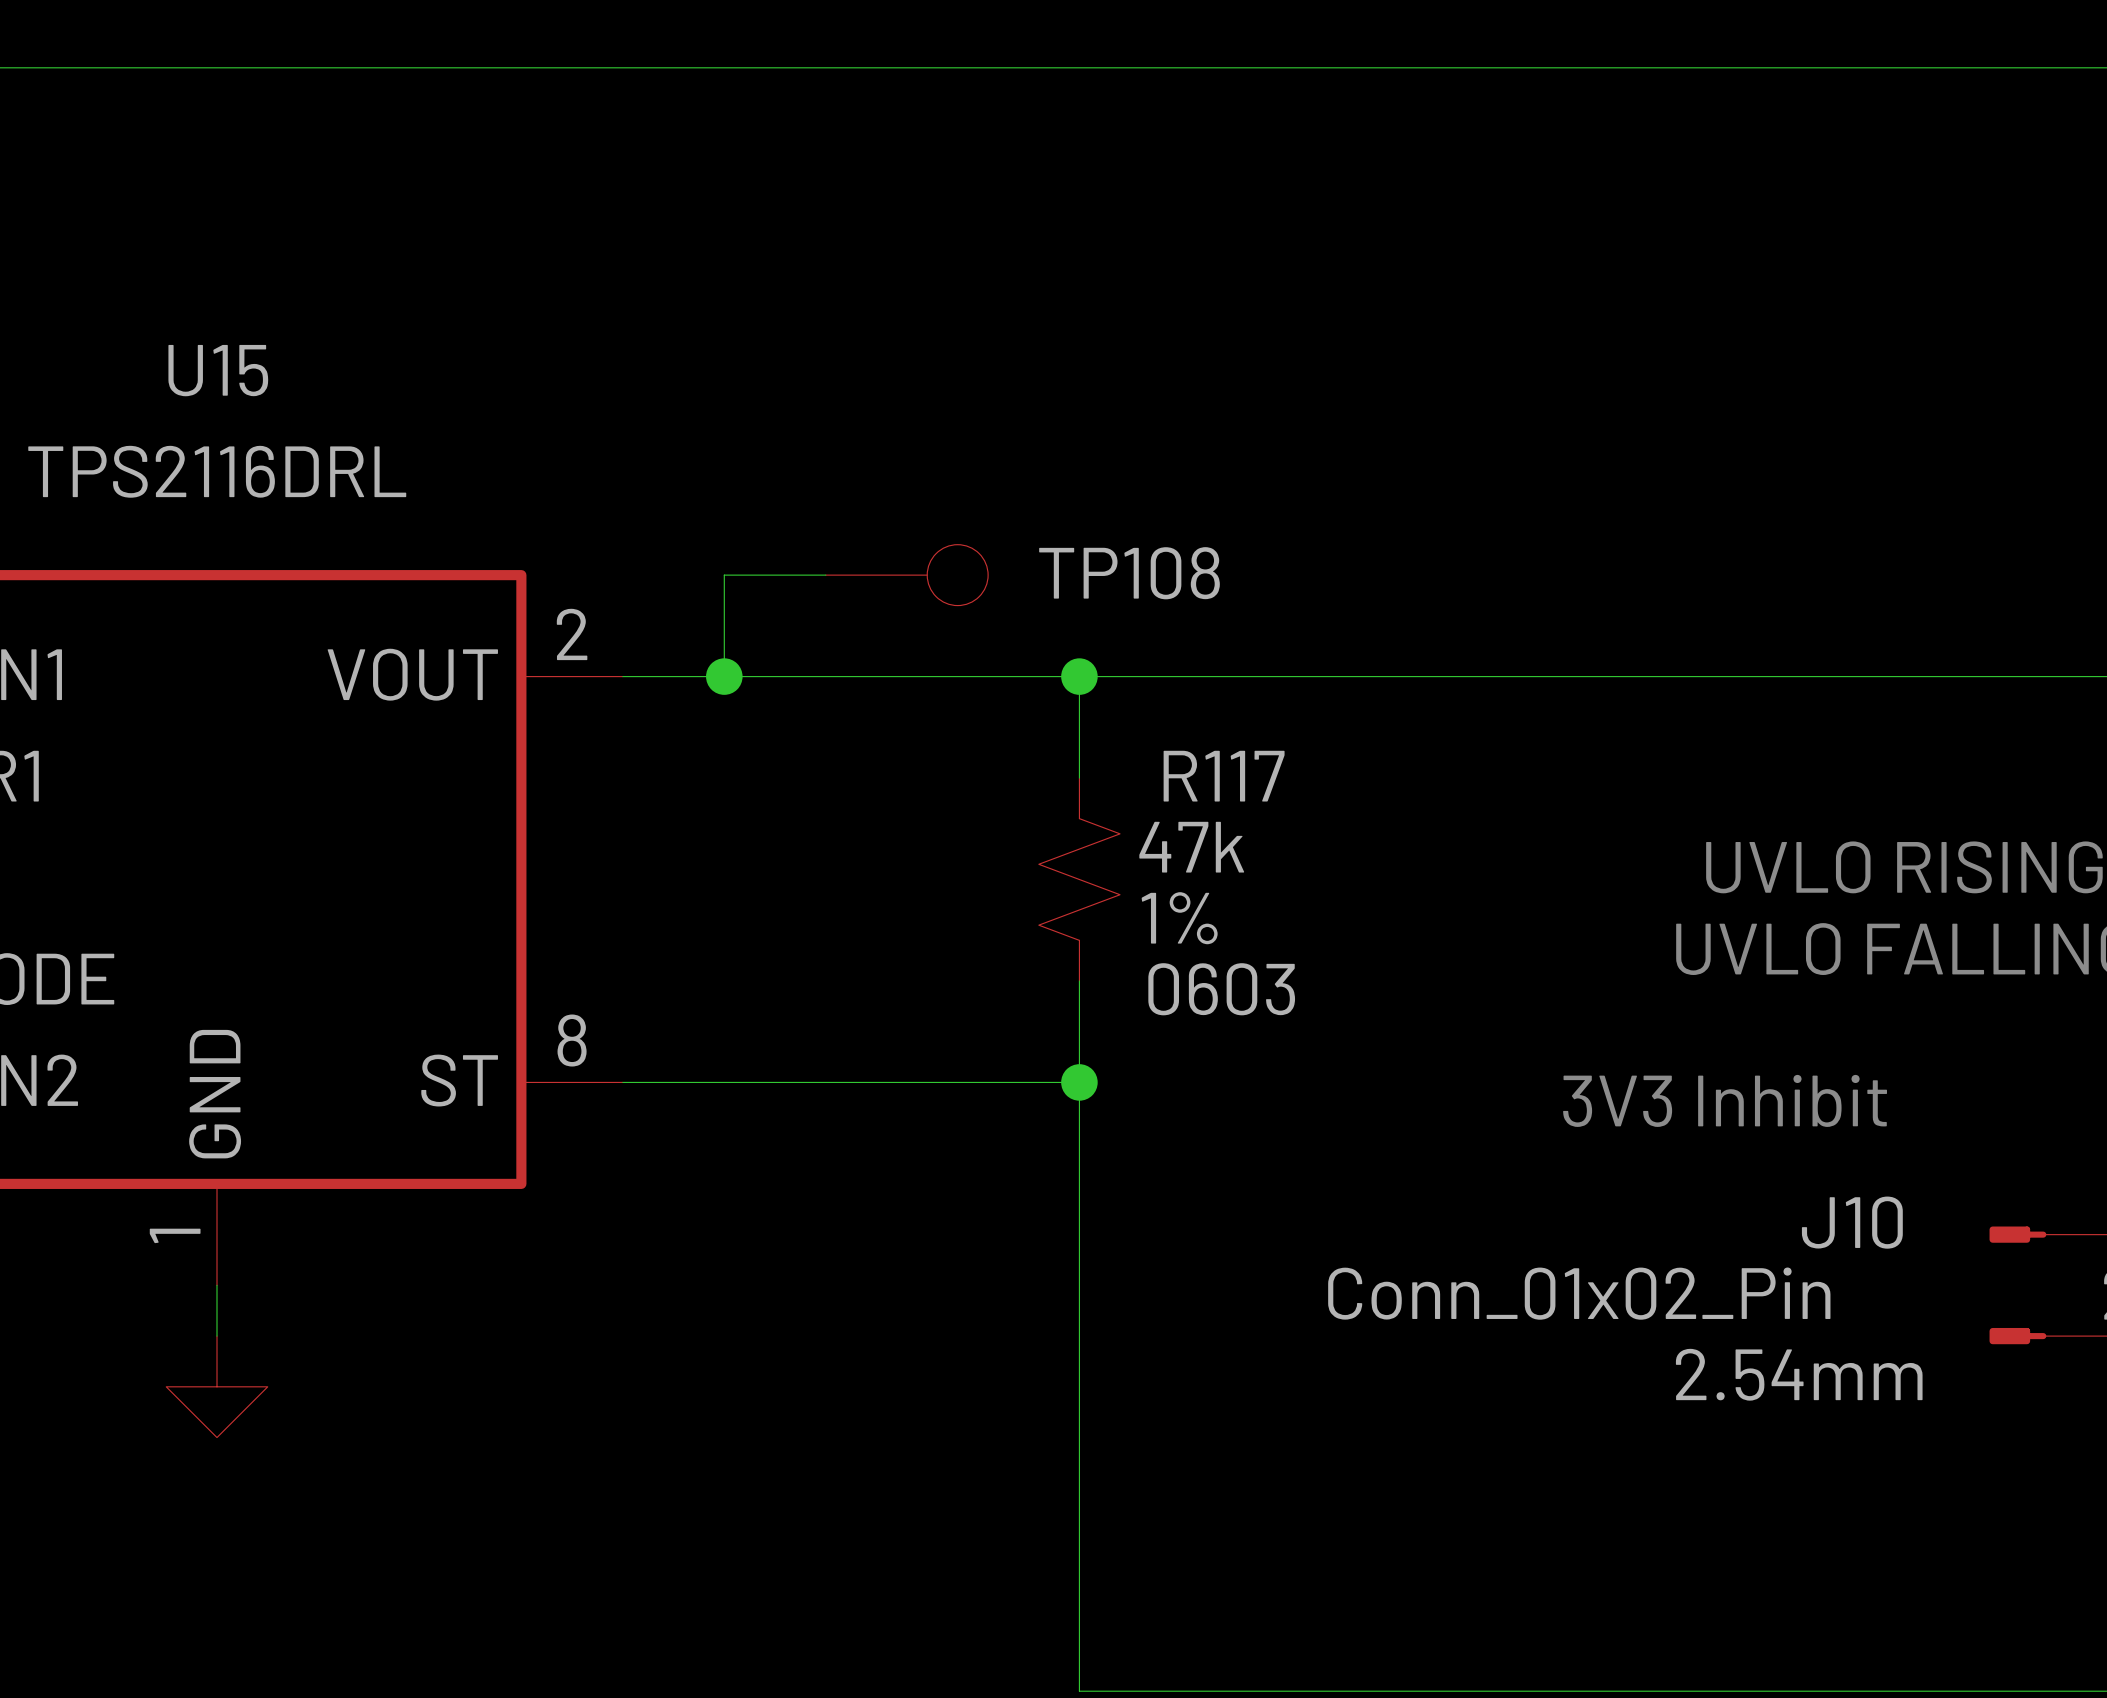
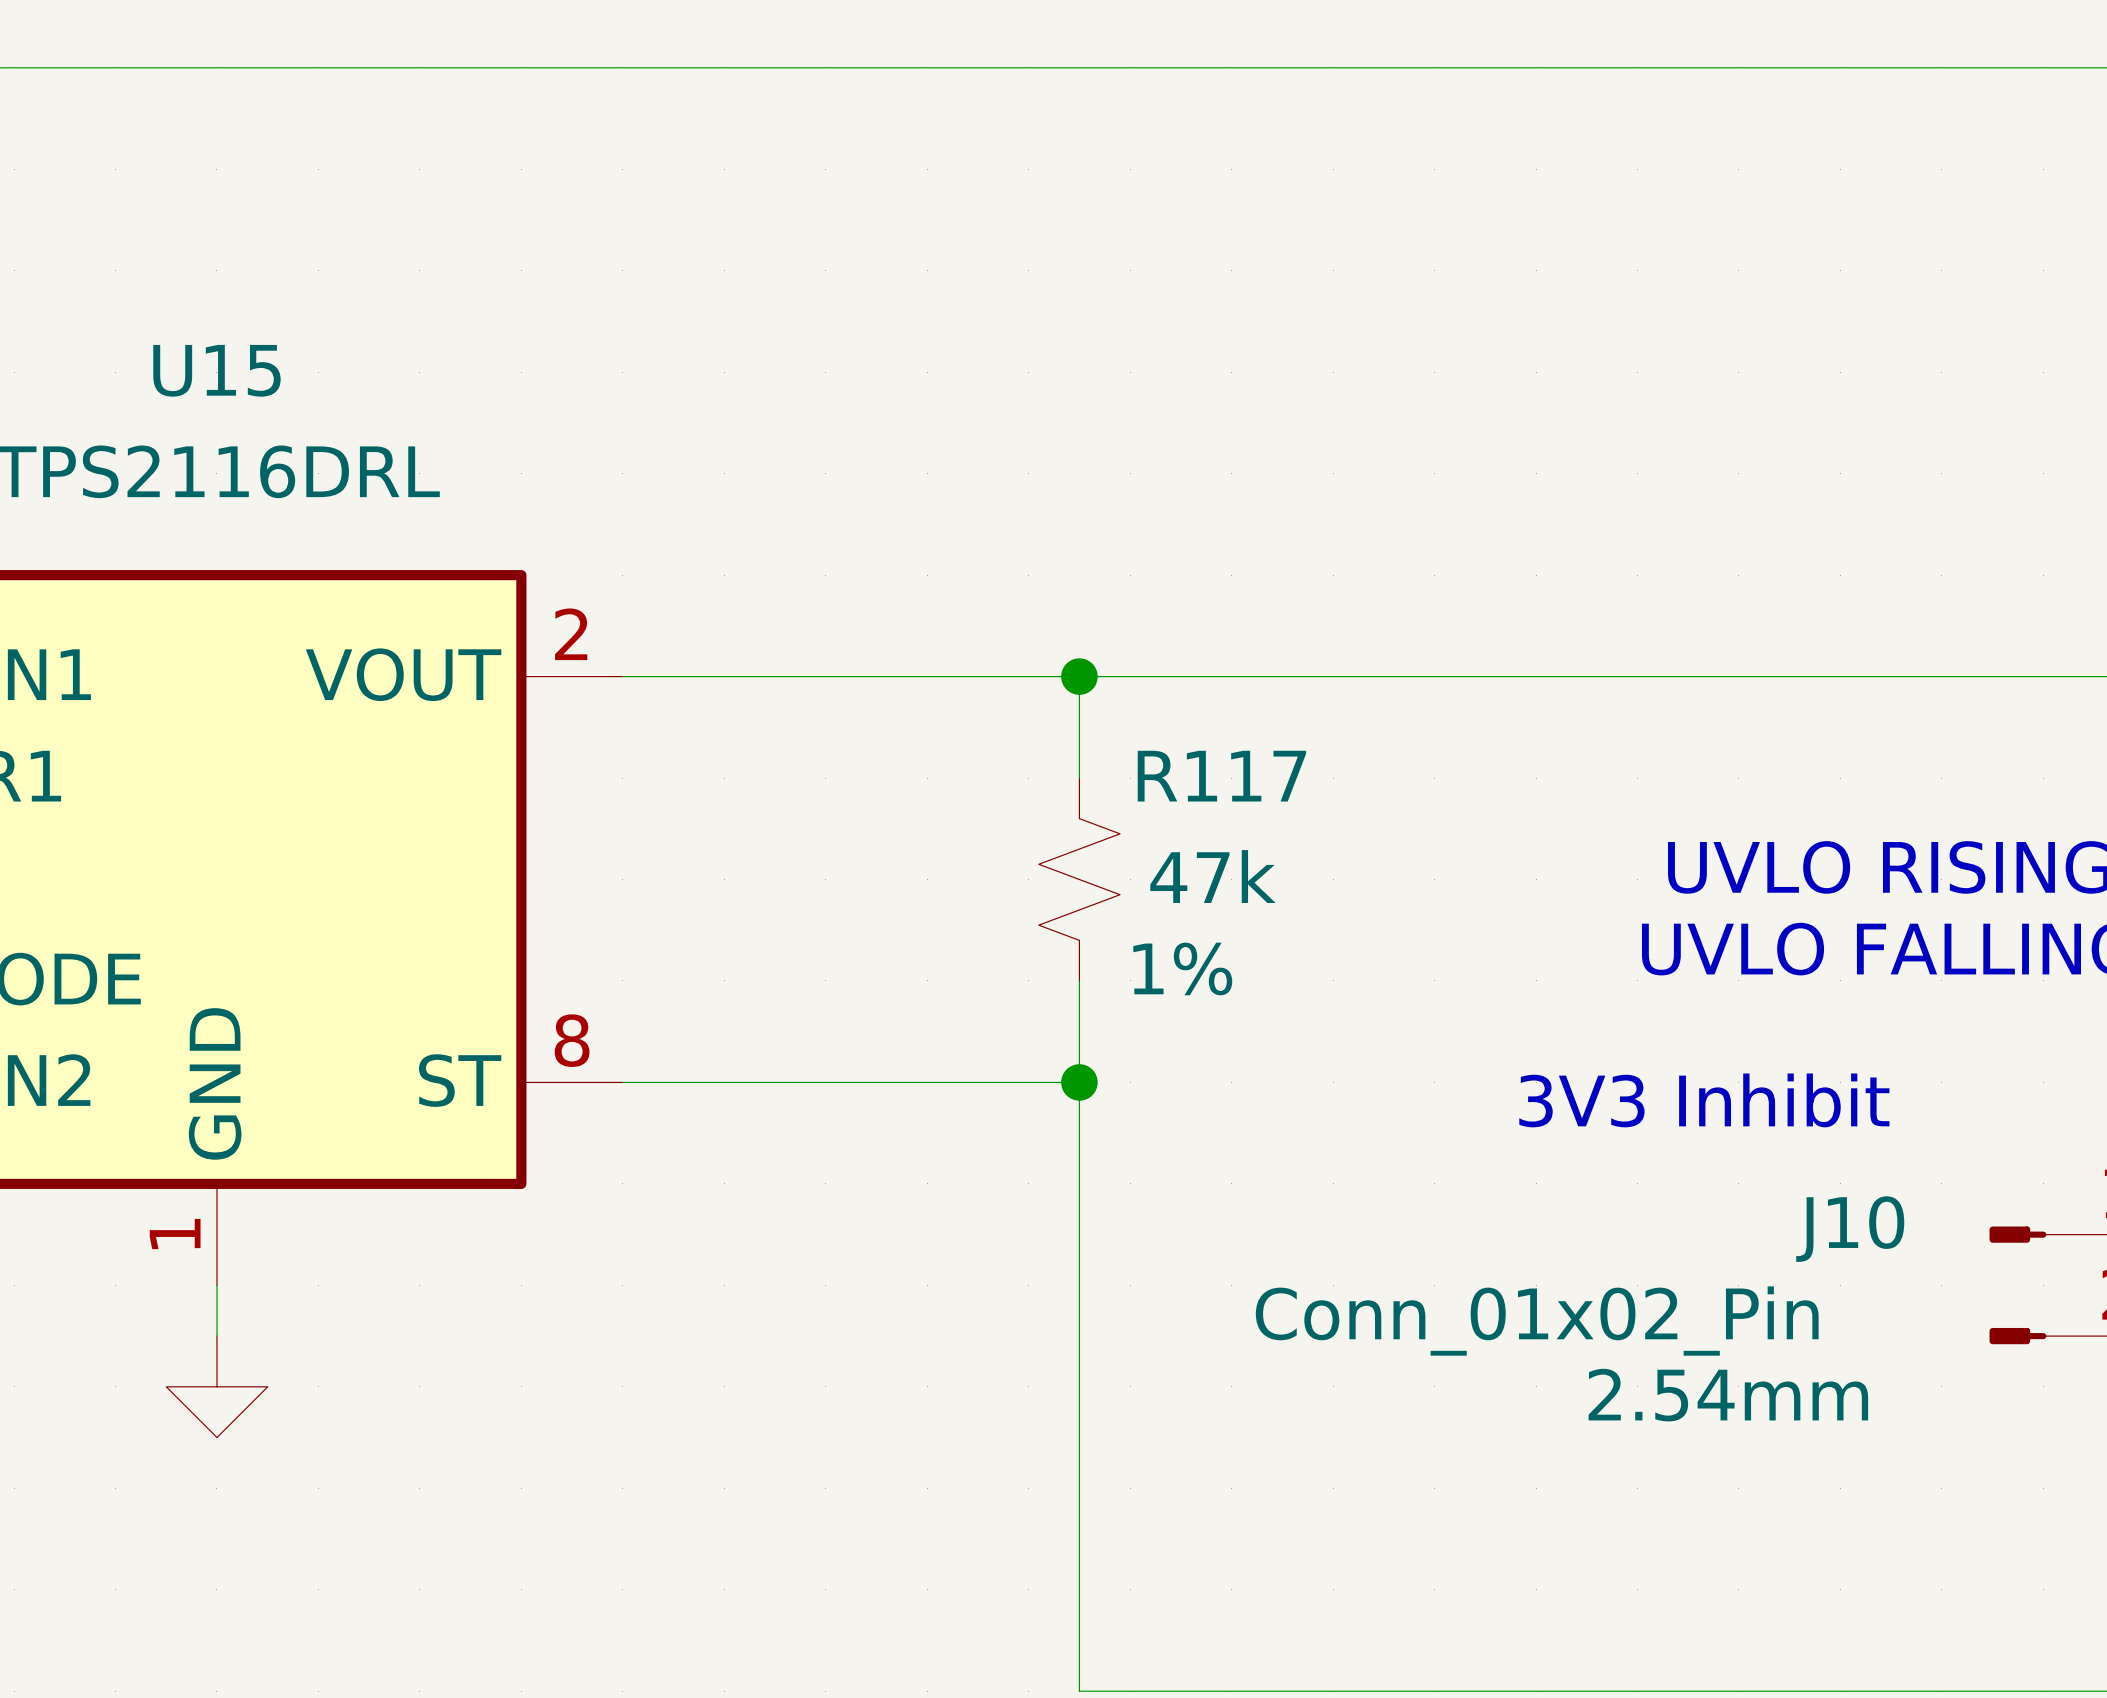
wire: (825, 575) (724, 575) (724, 676) -> none
TP108: (906, 575) -> none
junction: (724, 676) -> none
R117 value position: 47k (1191, 847) -> 47k (1212, 876)
R117 text position: 1% (1179, 918) -> 1% (1182, 968)
R117 text: 0603 (1221, 989) -> none
J10 value position: Conn_01x02_Pin (1579, 1293) -> Conn_01x02_Pin (1537, 1321)
J10 text position: 2.54mm (1799, 1374) -> 2.54mm (1728, 1395)

